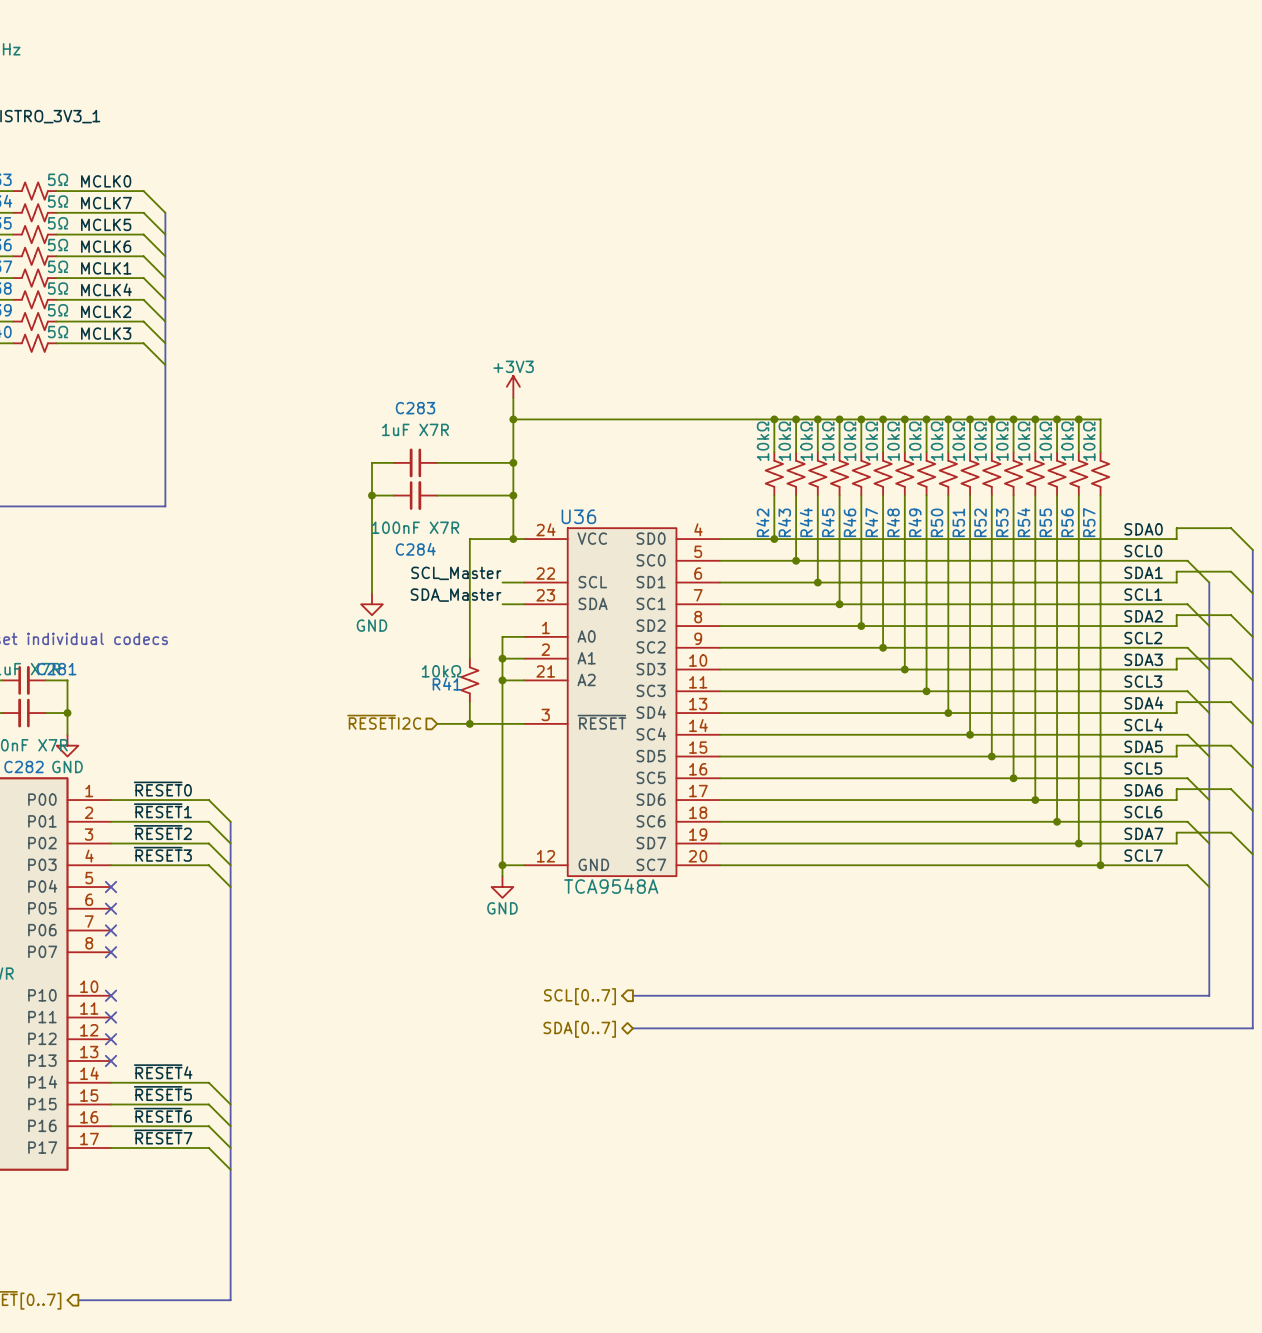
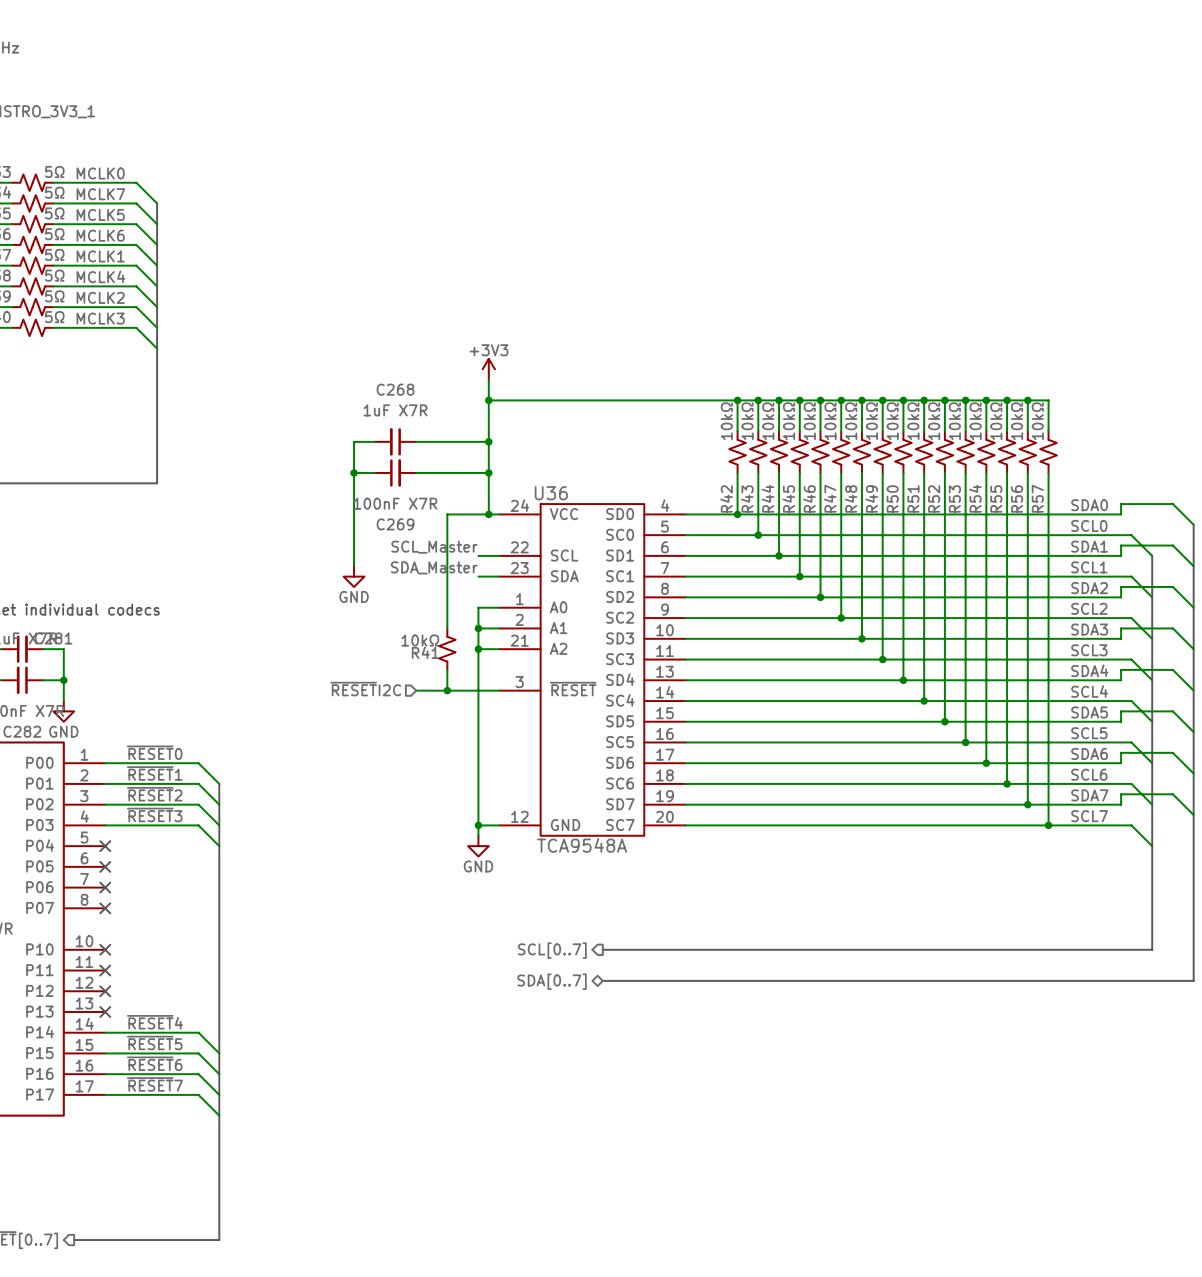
C283 name: C283 (415, 408) -> C268 (395, 389)
C284 name: C284 (415, 549) -> C269 (395, 524)

